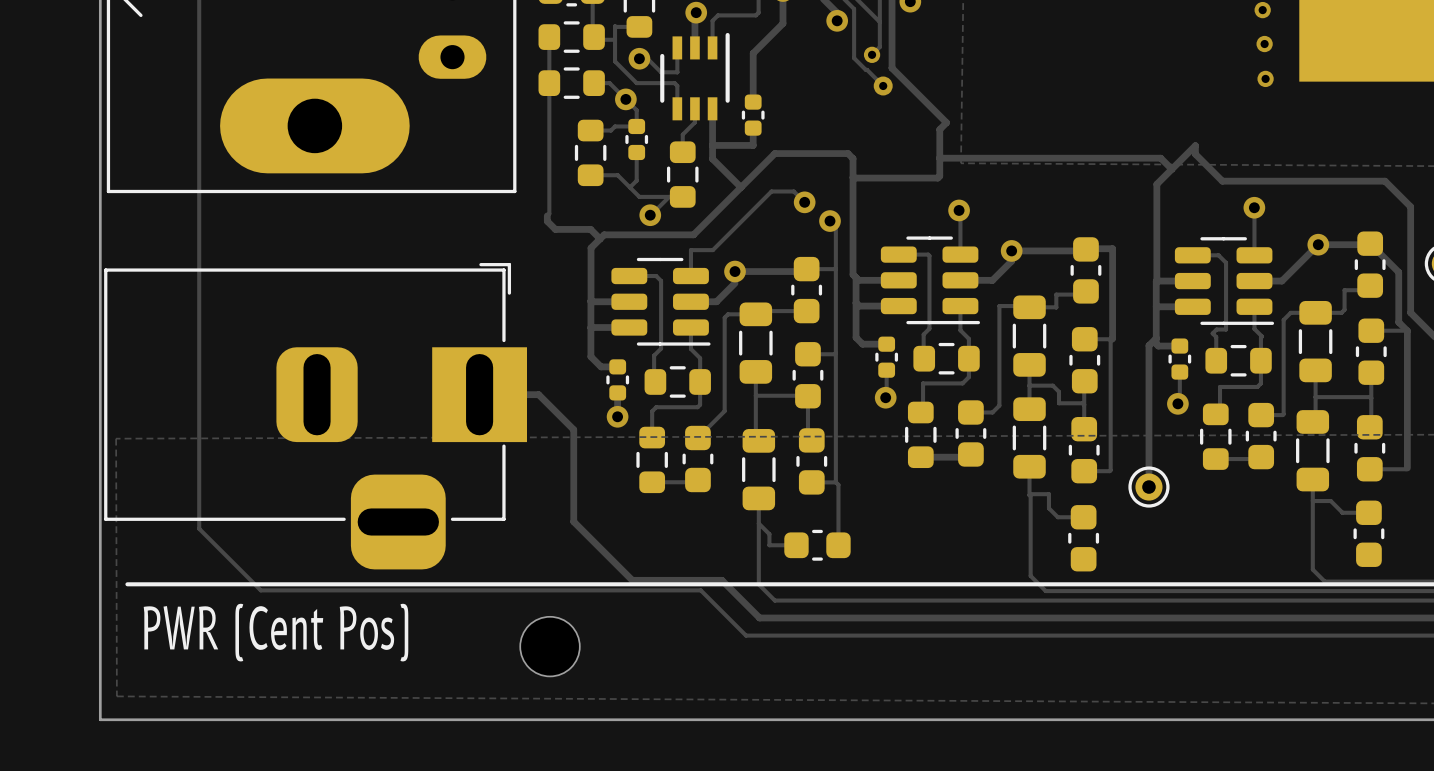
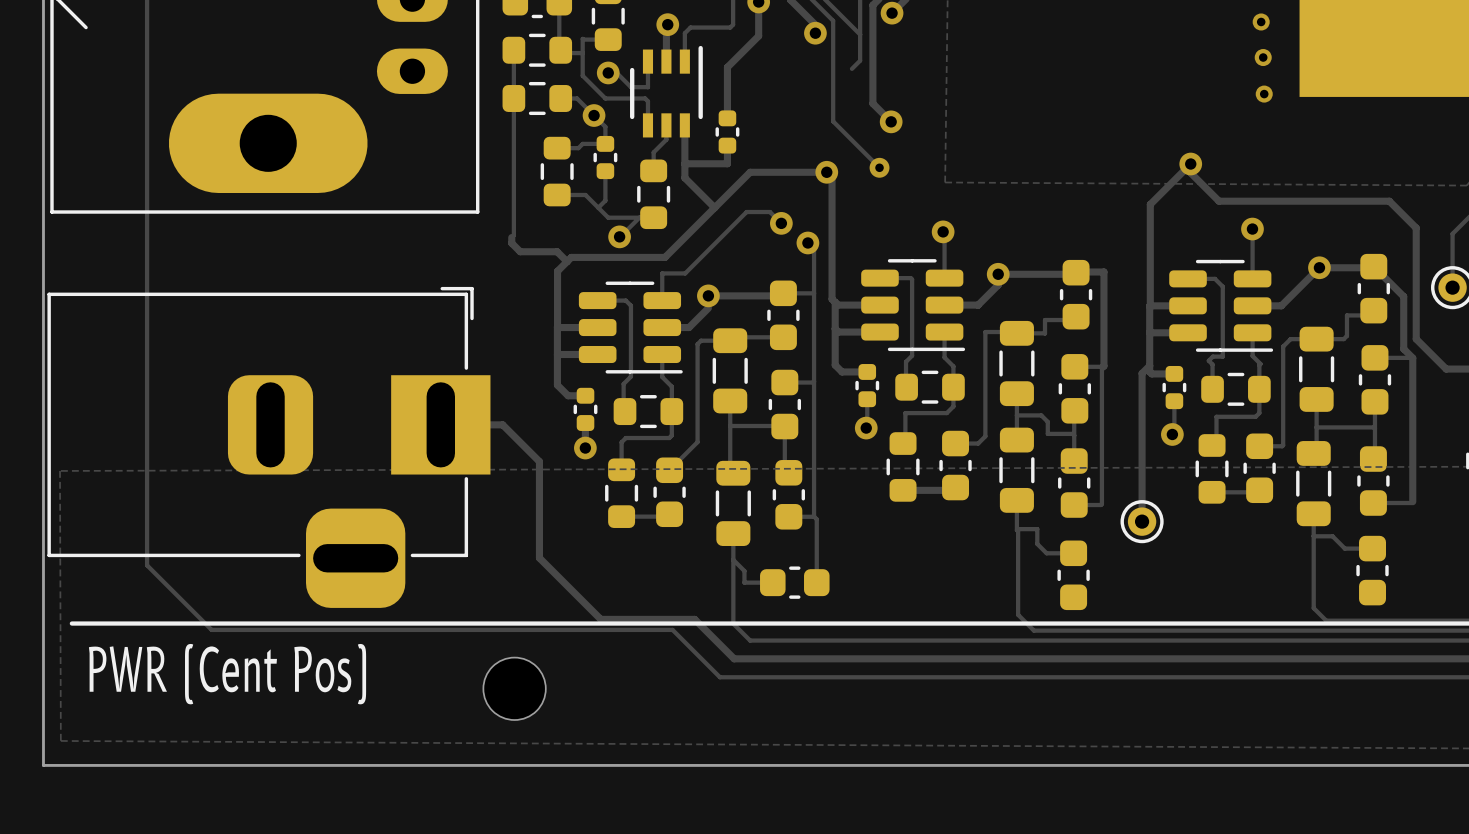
via: (872, 54) -> none
track: (854, 58) (883, 85) -> (833, 72) (833, 121) (879, 167)
track: (892, 68) (946, 122) (939, 129) (939, 176) (937, 178) (853, 177) -> (872, 82) (872, 103) (891, 121)
via position: (883, 85) -> (879, 167)
via: none -> (891, 121)
via: none -> (1190, 164)
via: none -> (826, 172)
track: (939, 158) (1160, 158) (1171, 169) -> none

